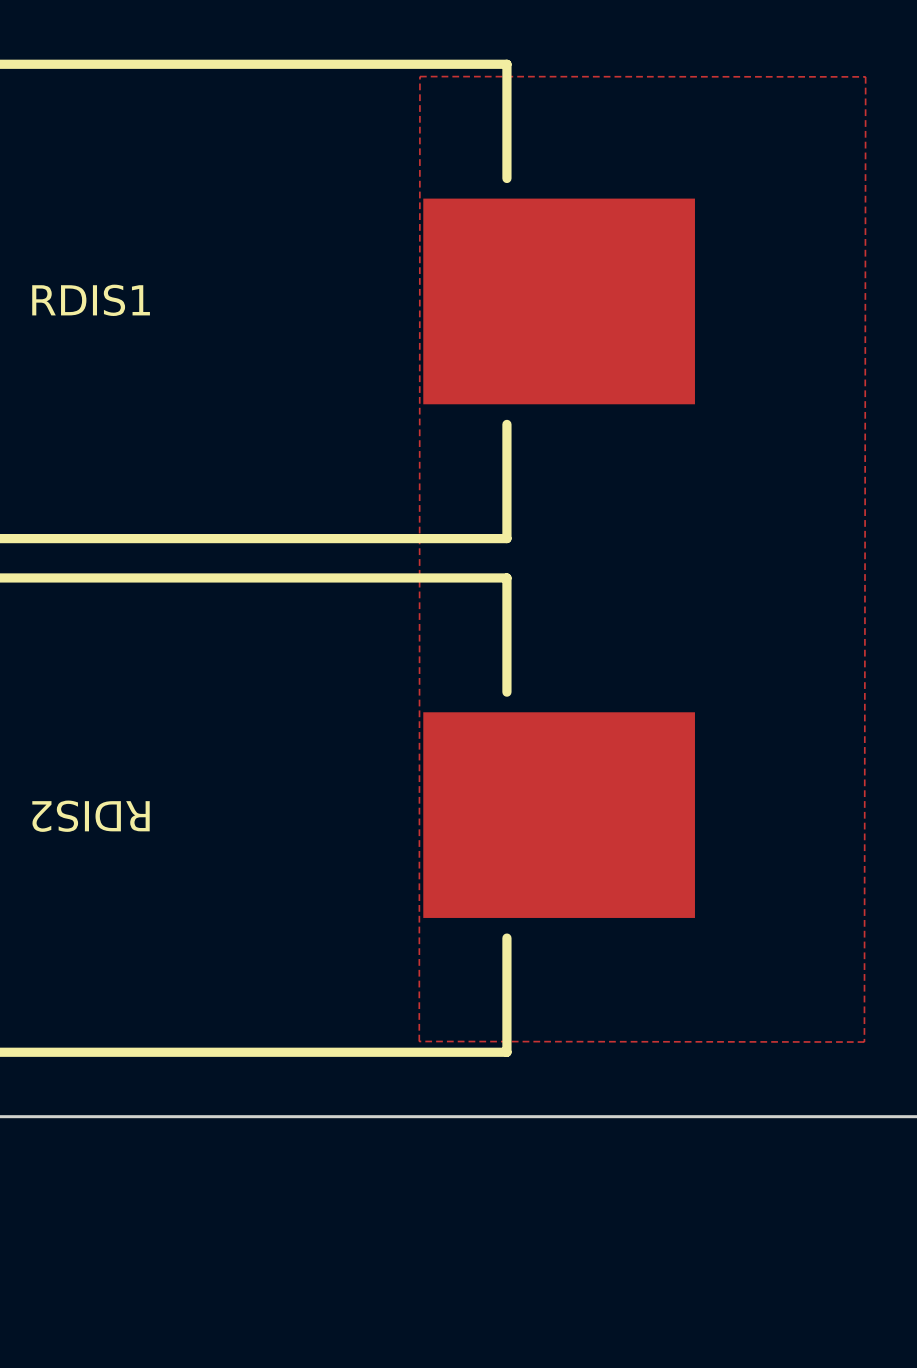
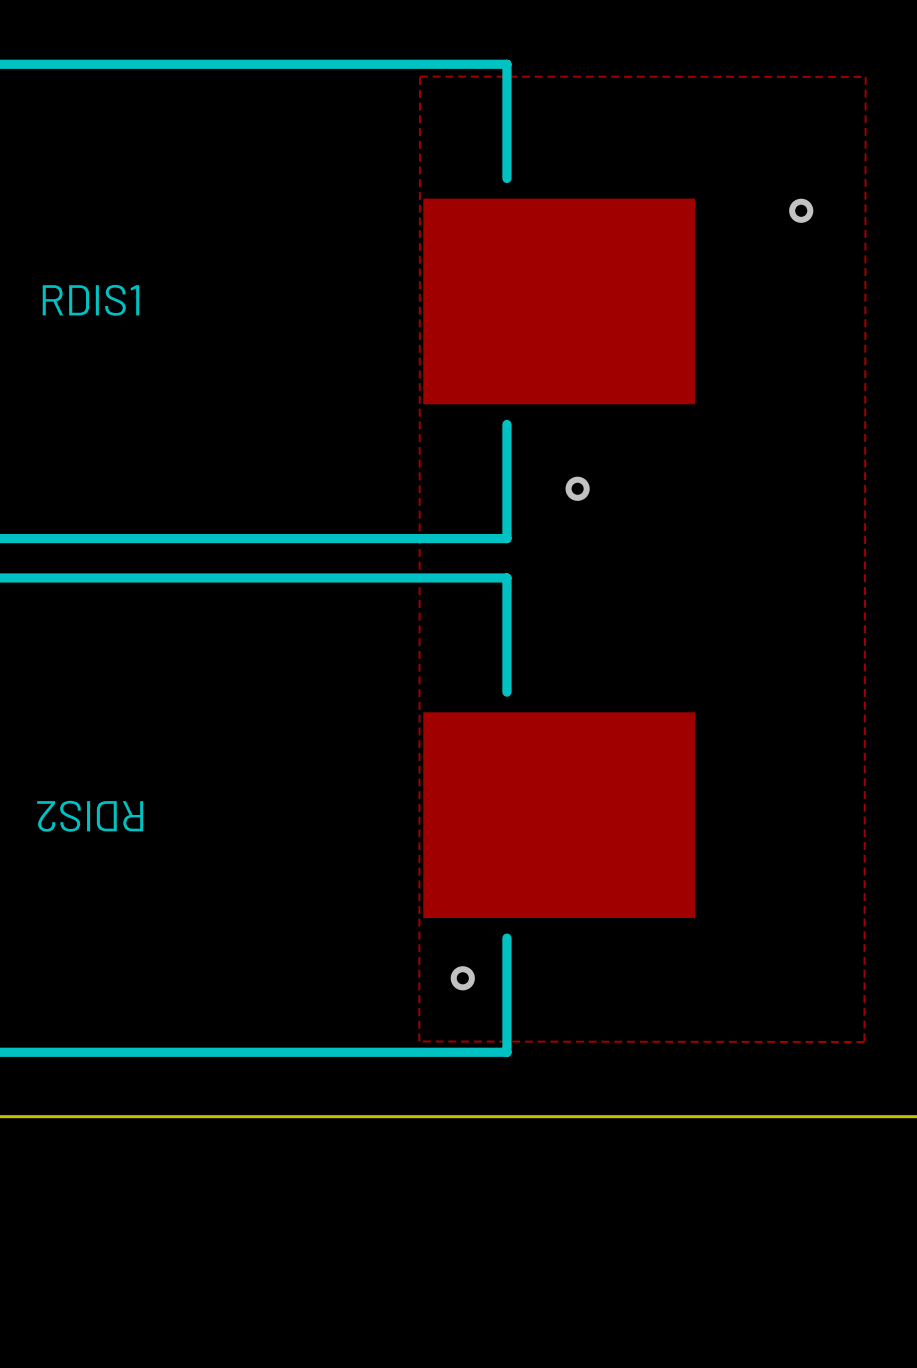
via: none -> (801, 210)
via: none -> (577, 488)
via: none -> (462, 978)

